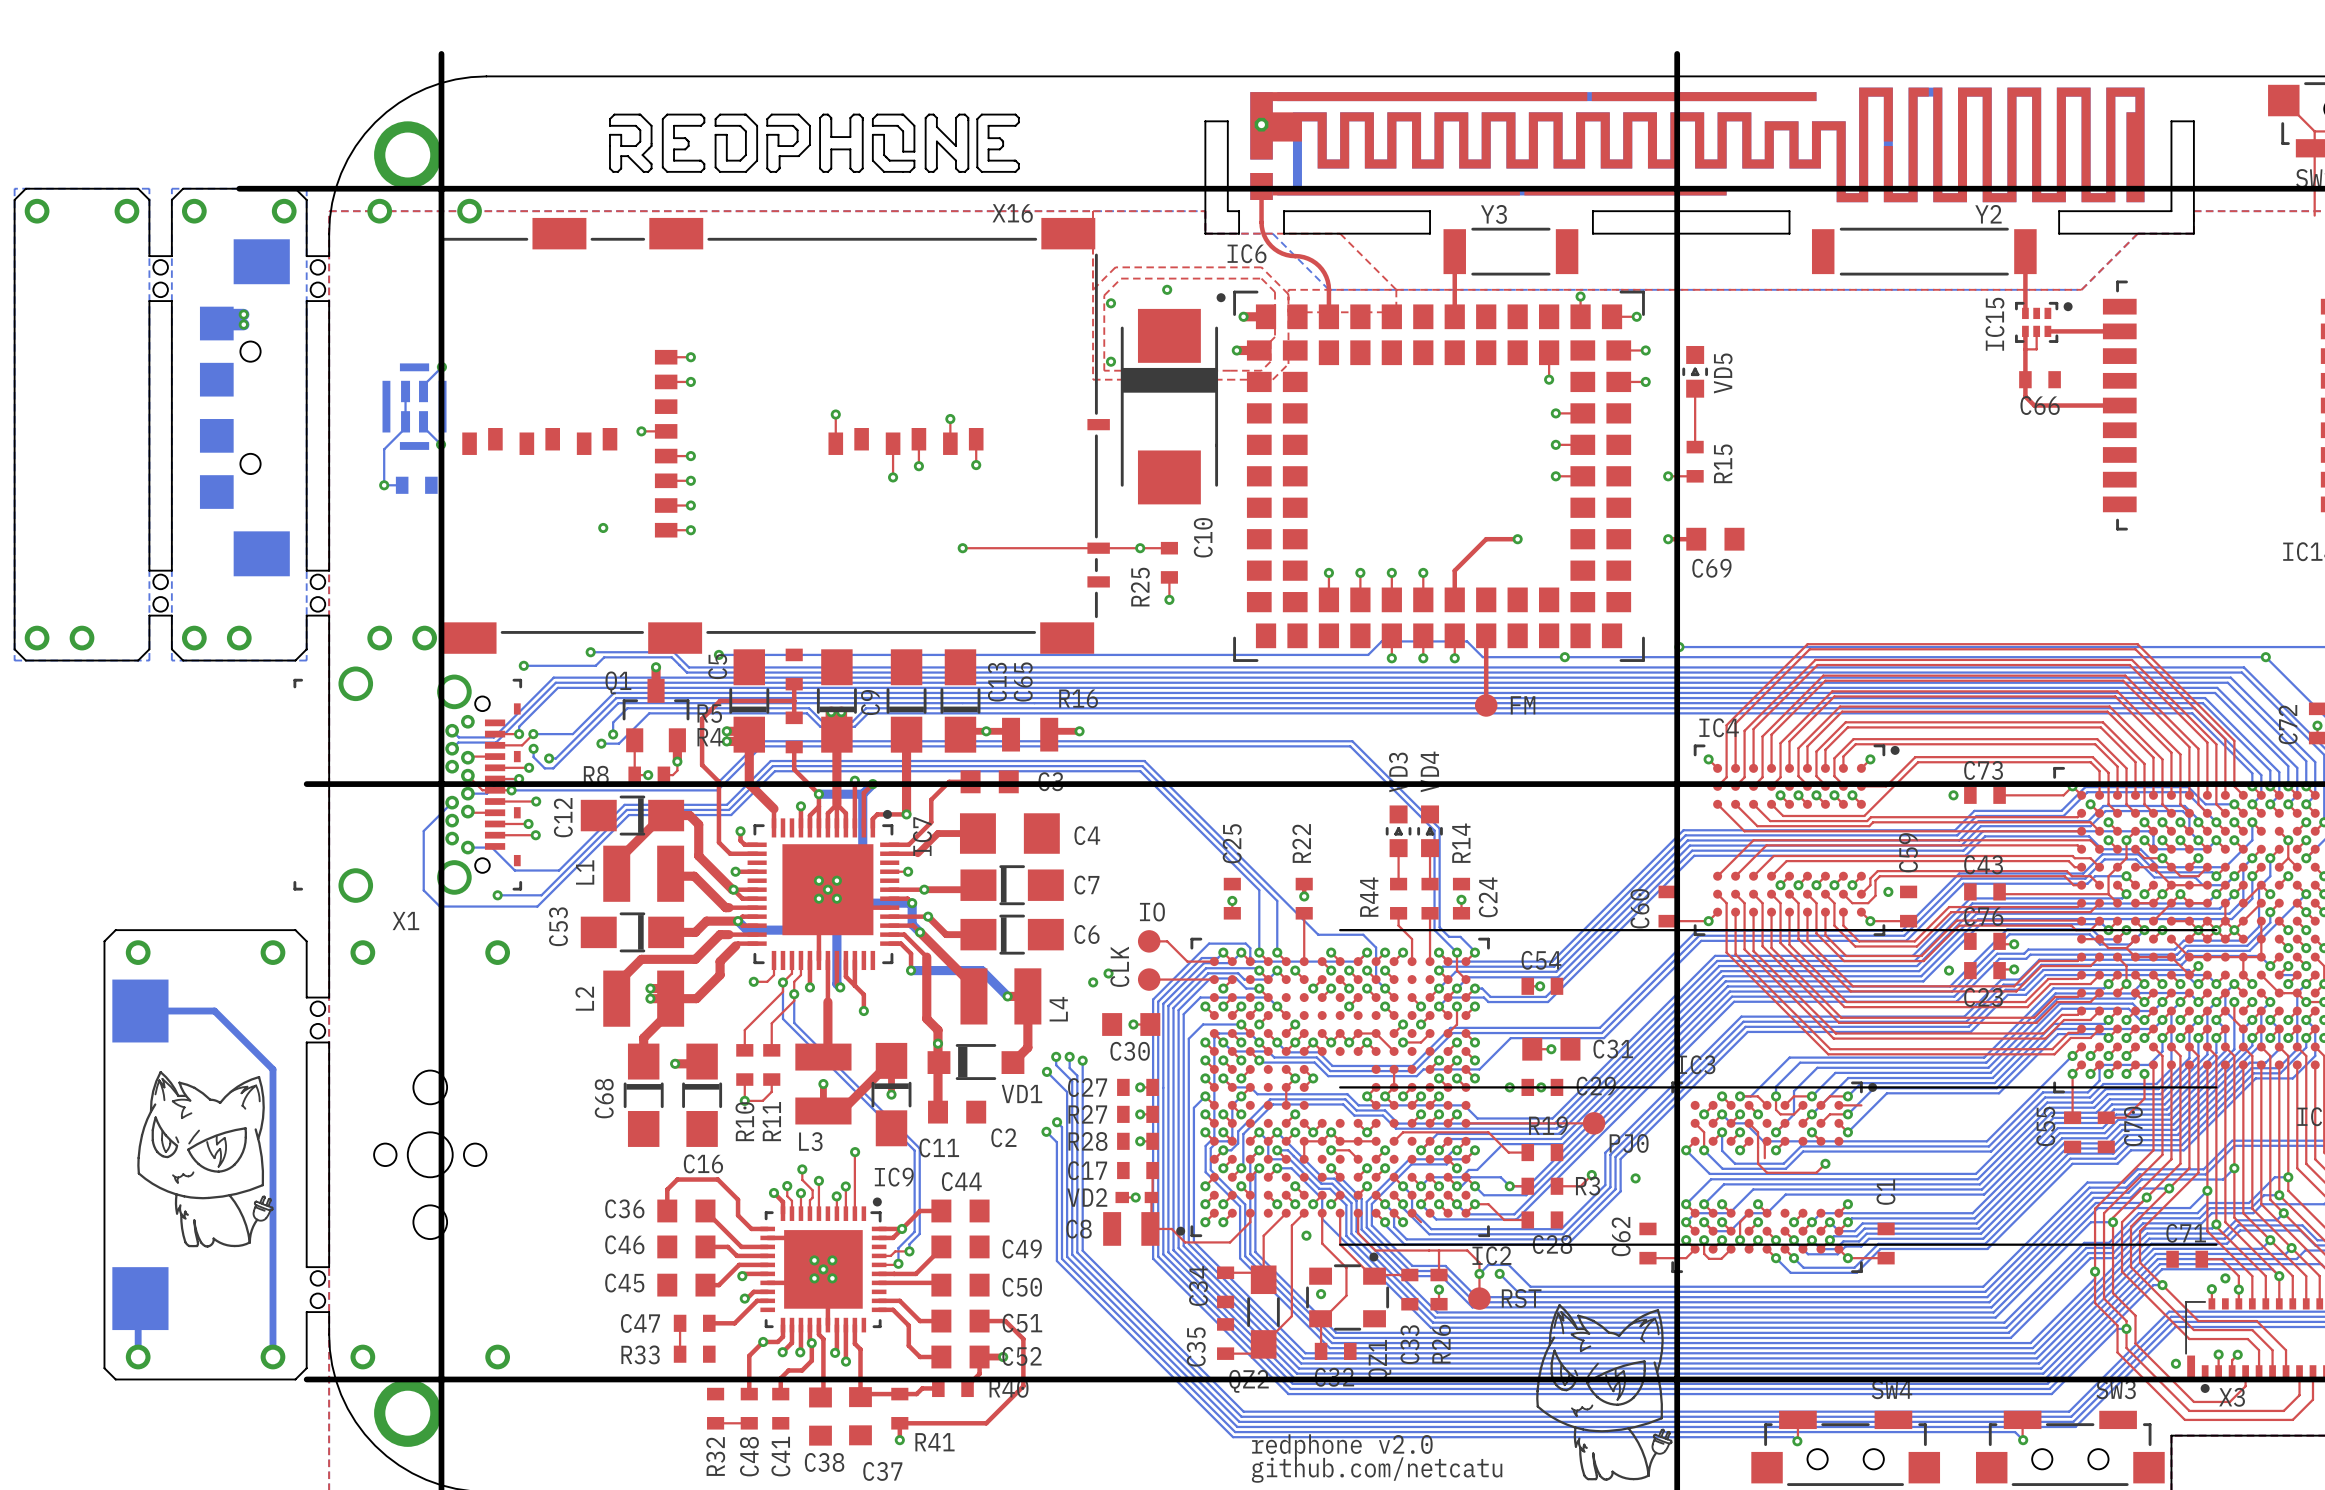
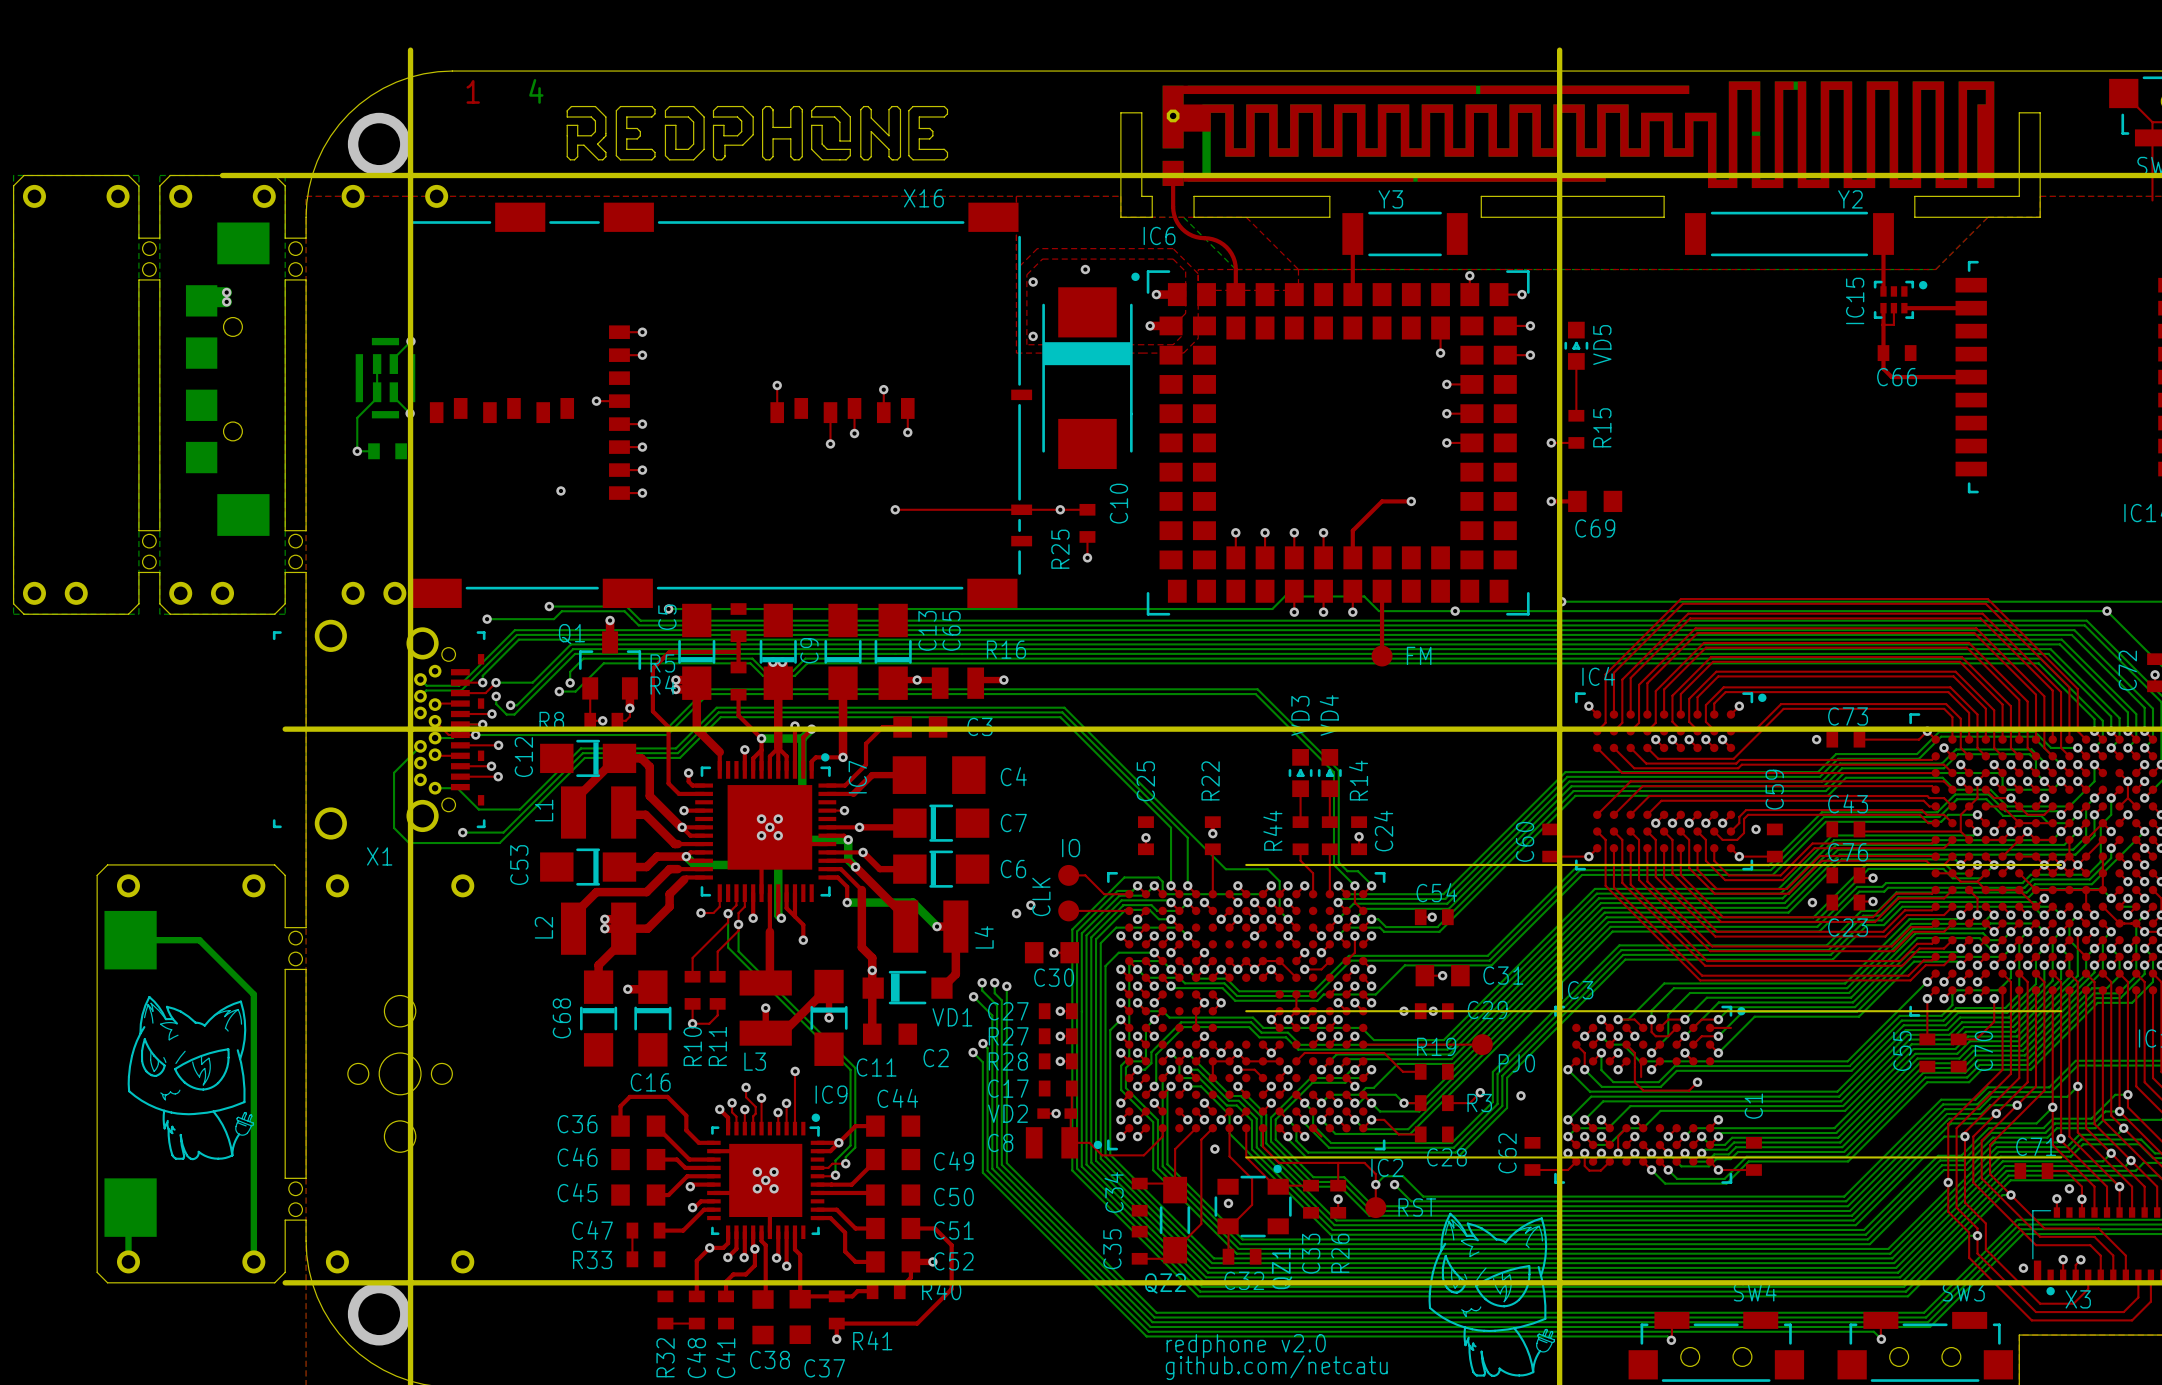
text: none -> 1 (473, 91)
text: none -> 4 (536, 91)
X16 name position: X16 (1012, 213) -> X16 (923, 198)

